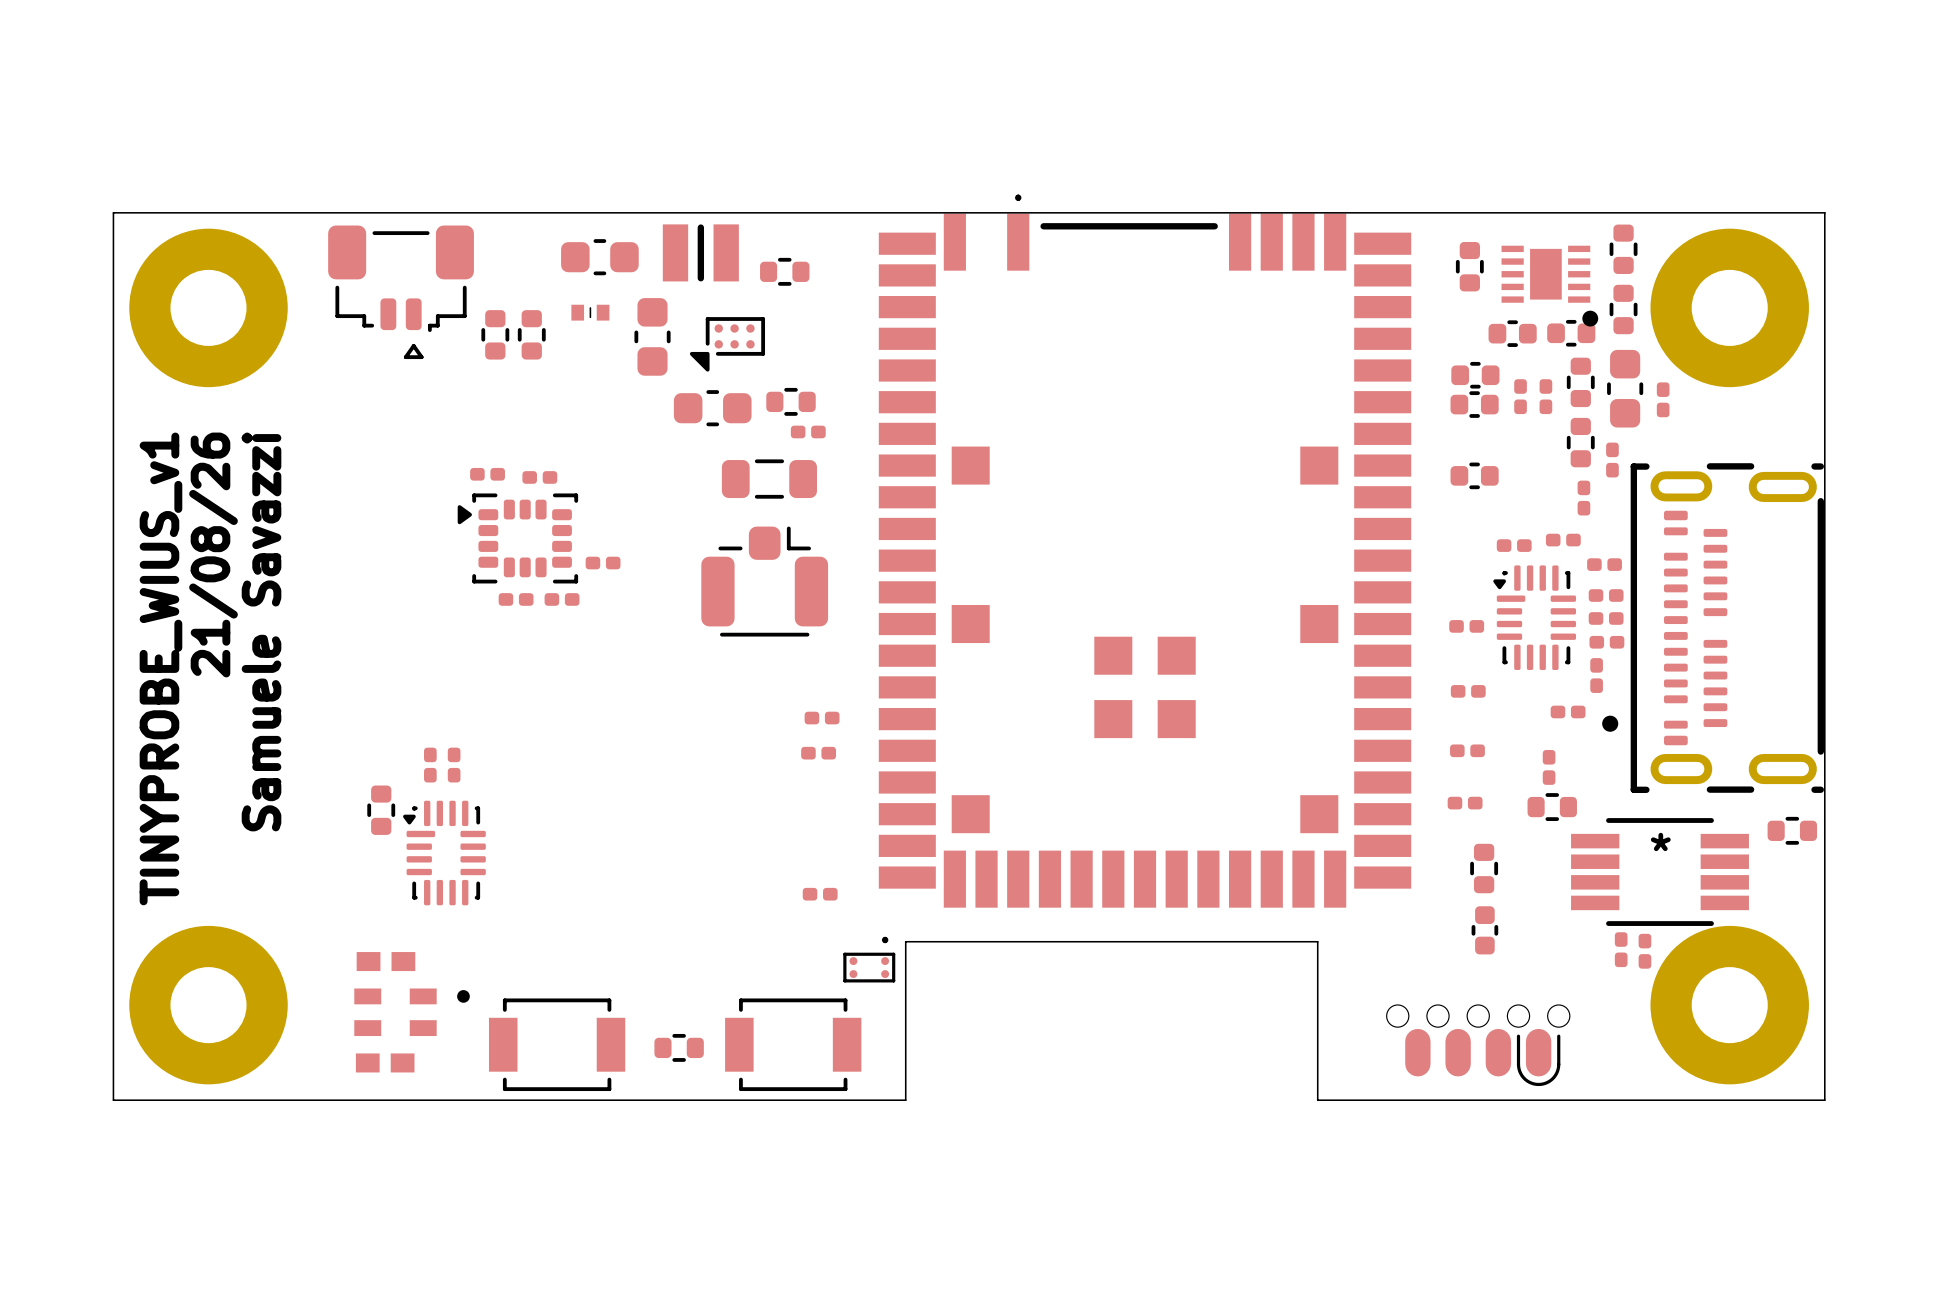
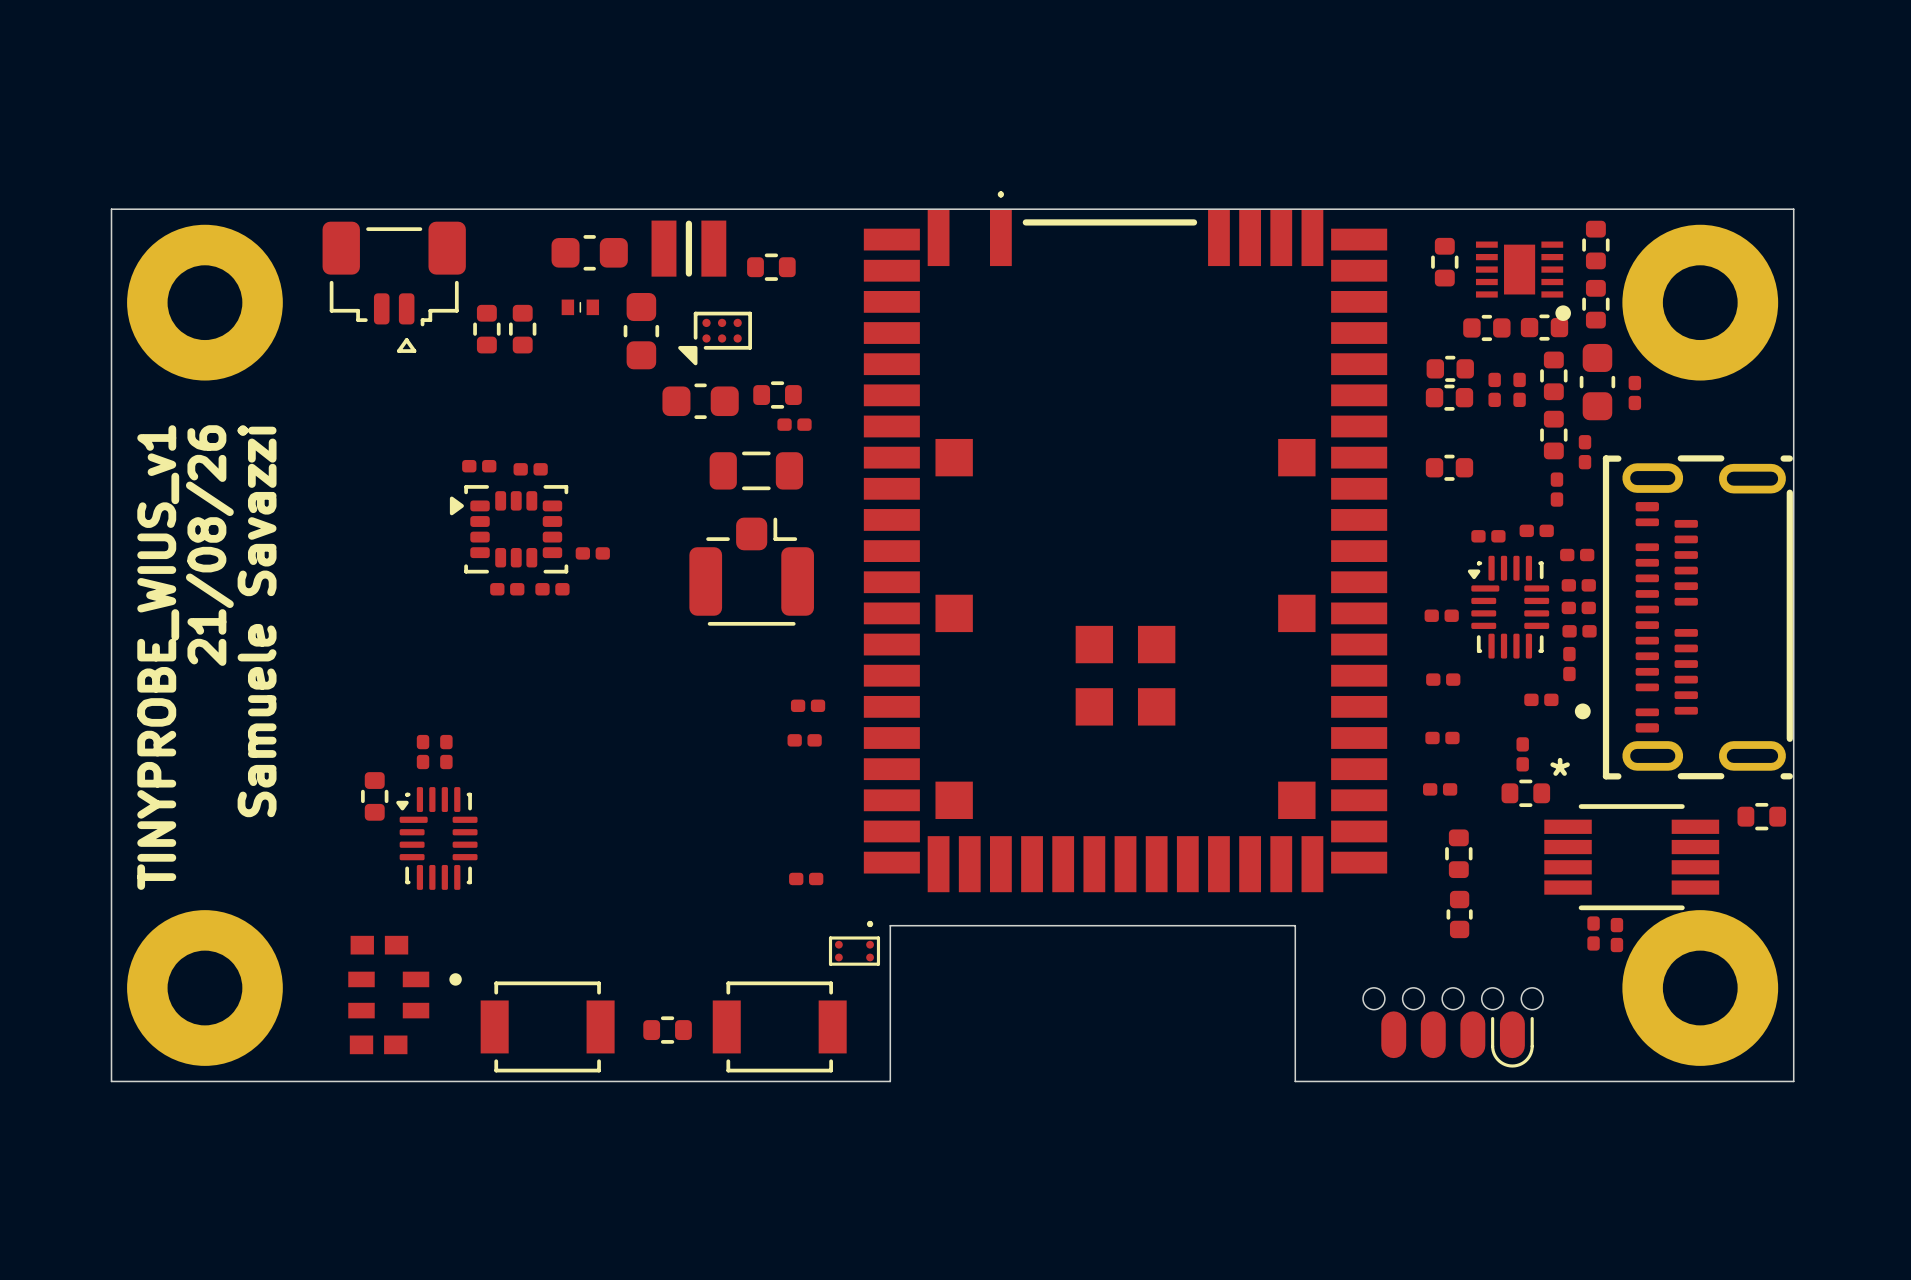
part text position: * (1660, 841) -> * (1560, 766)

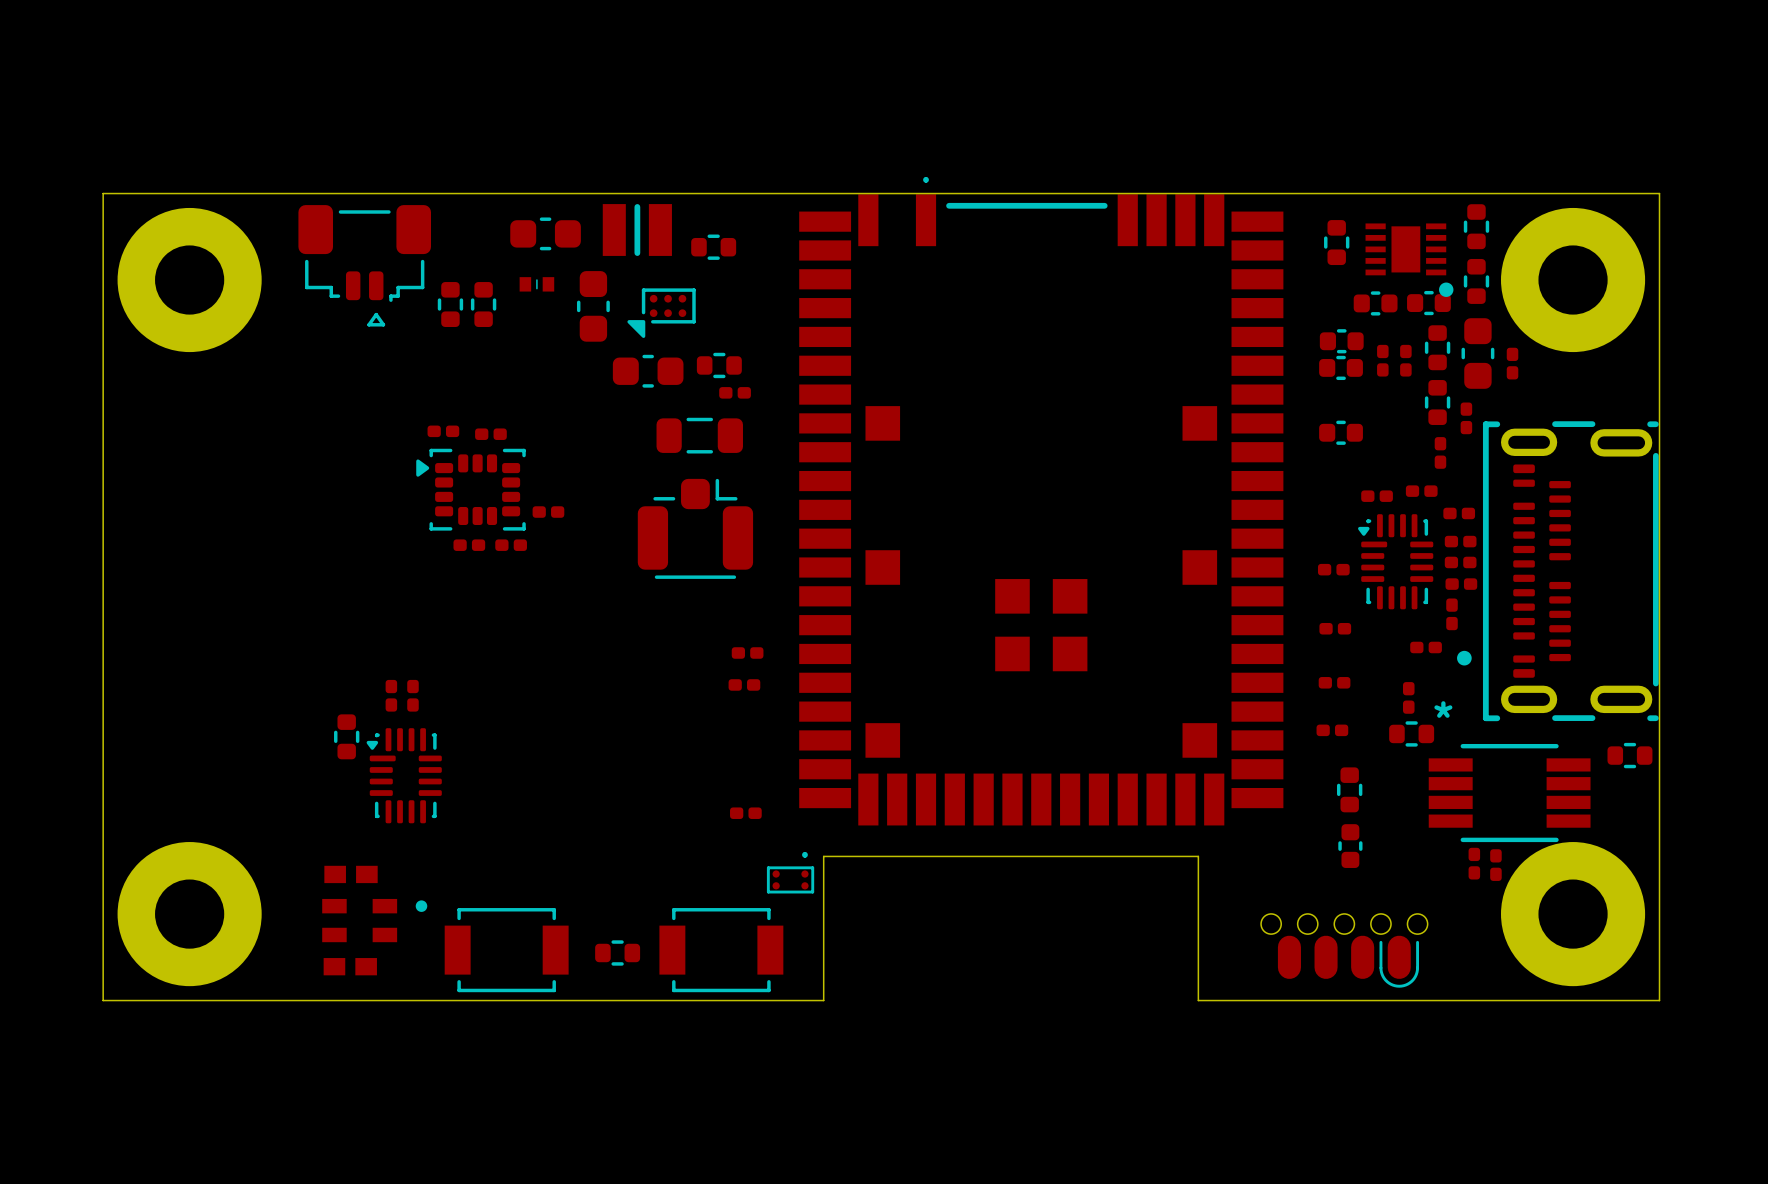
text: 21/08/26 (209, 545) -> none
text: Samuele Savazzi (257, 621) -> none
text: TINYPROBE_WIUS_v1 (158, 657) -> none

